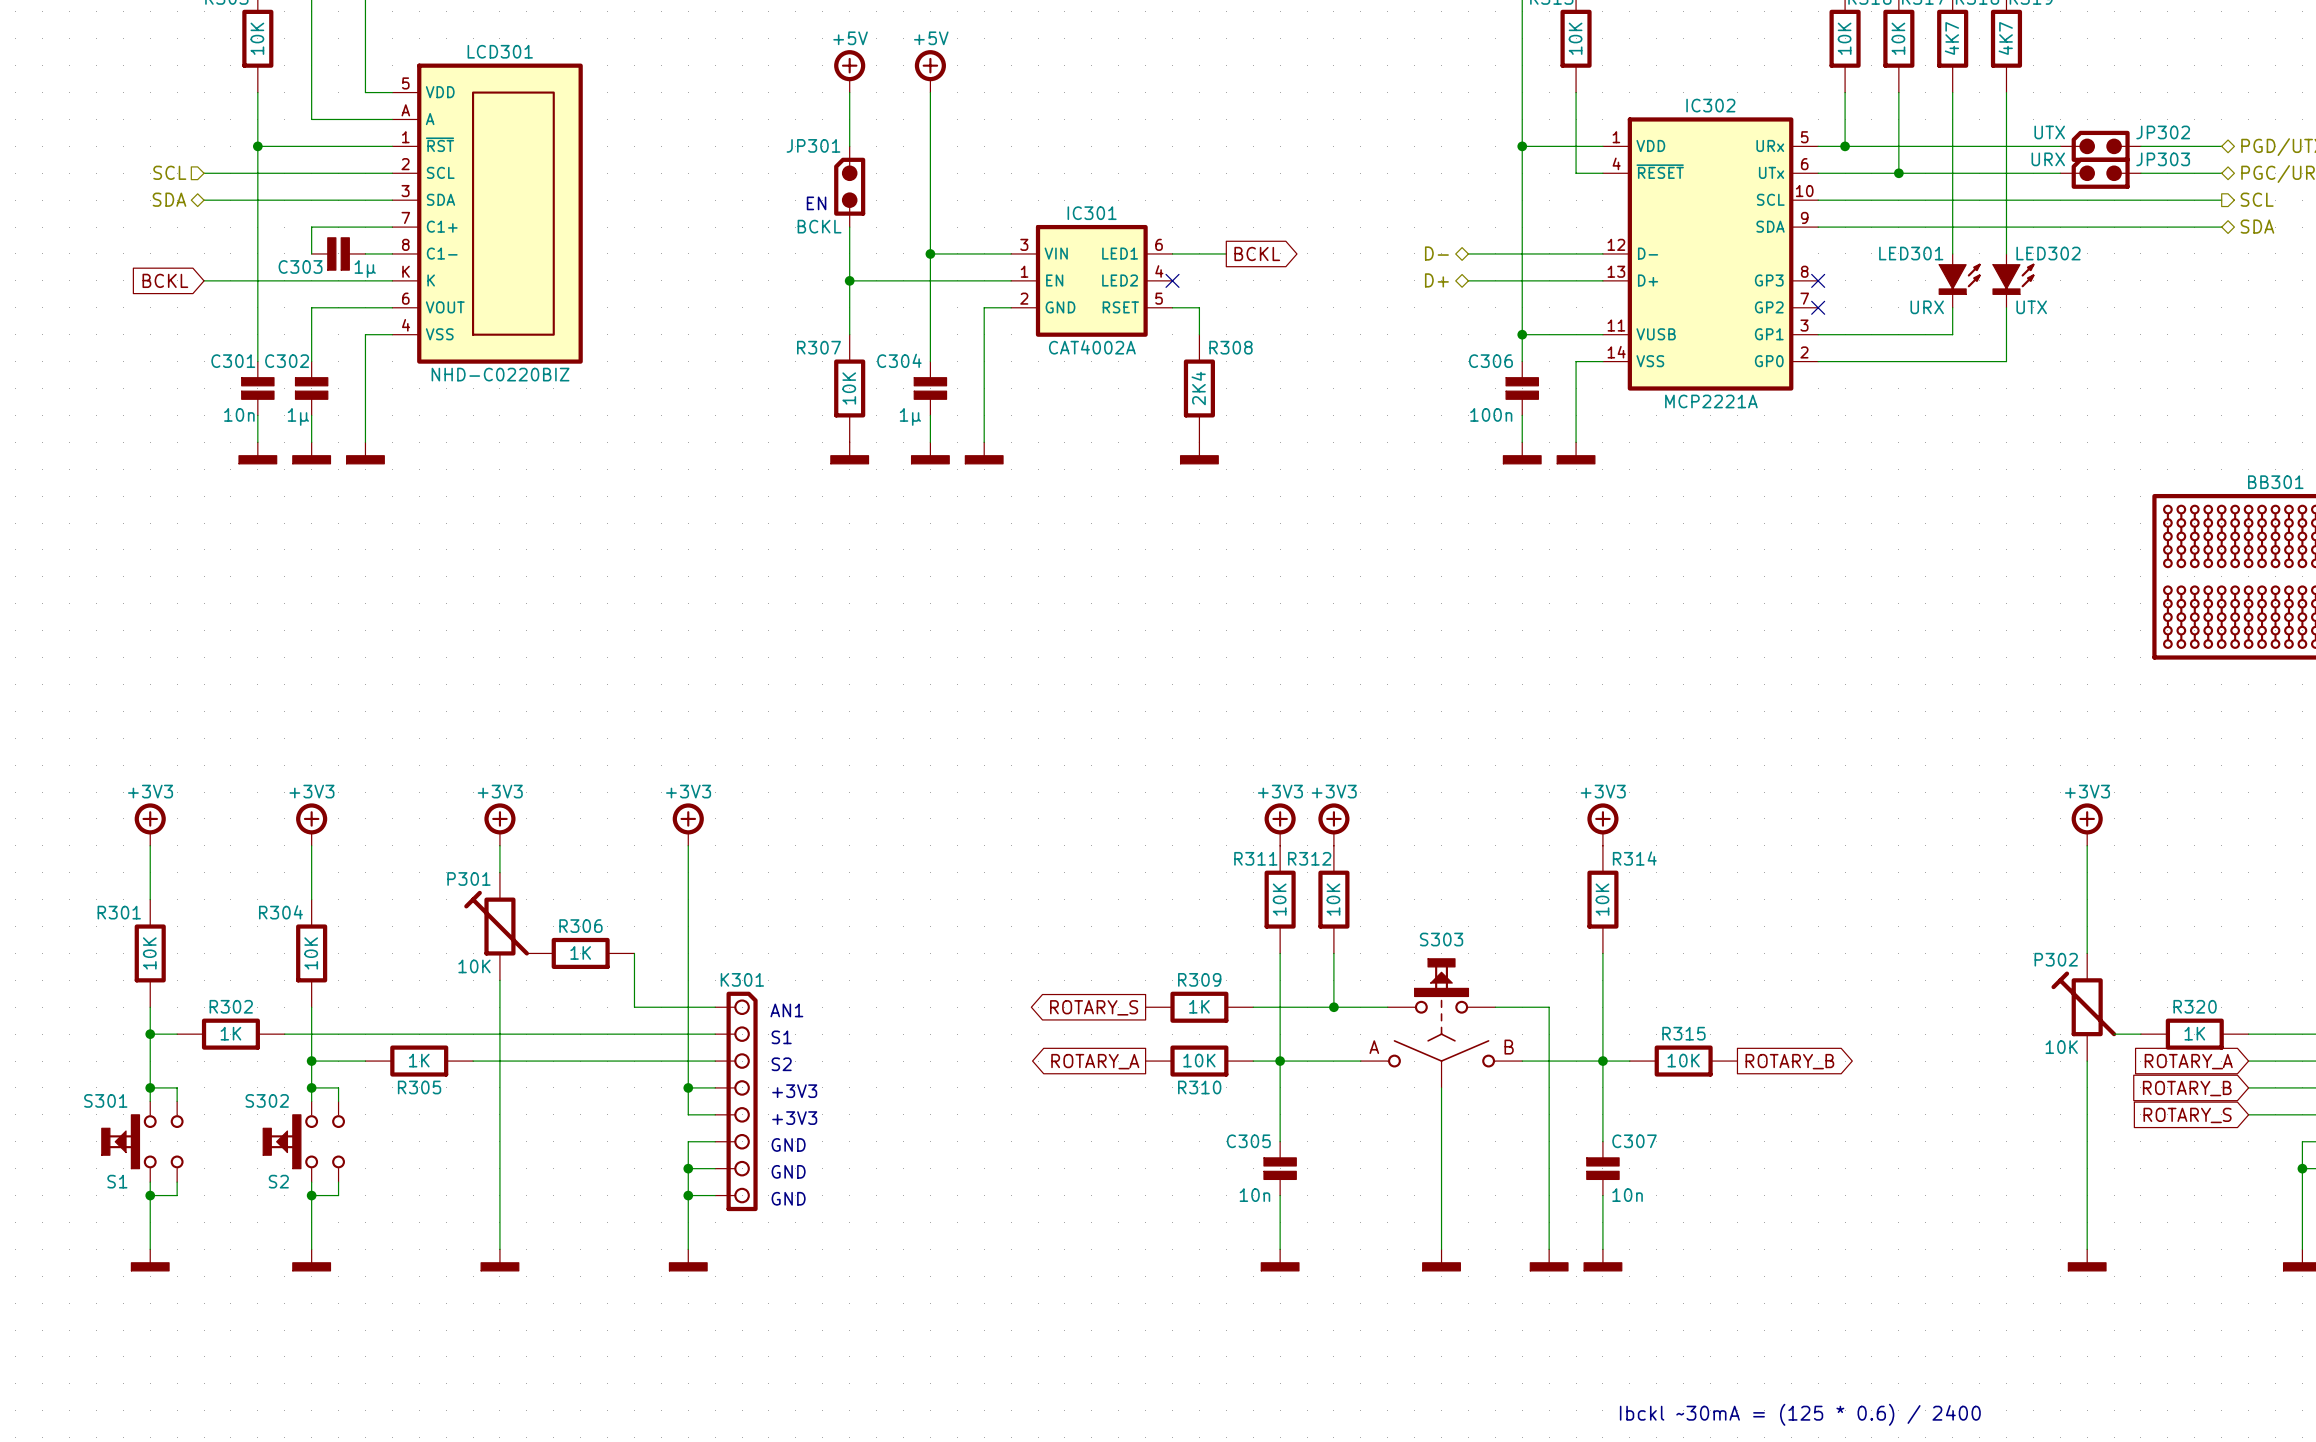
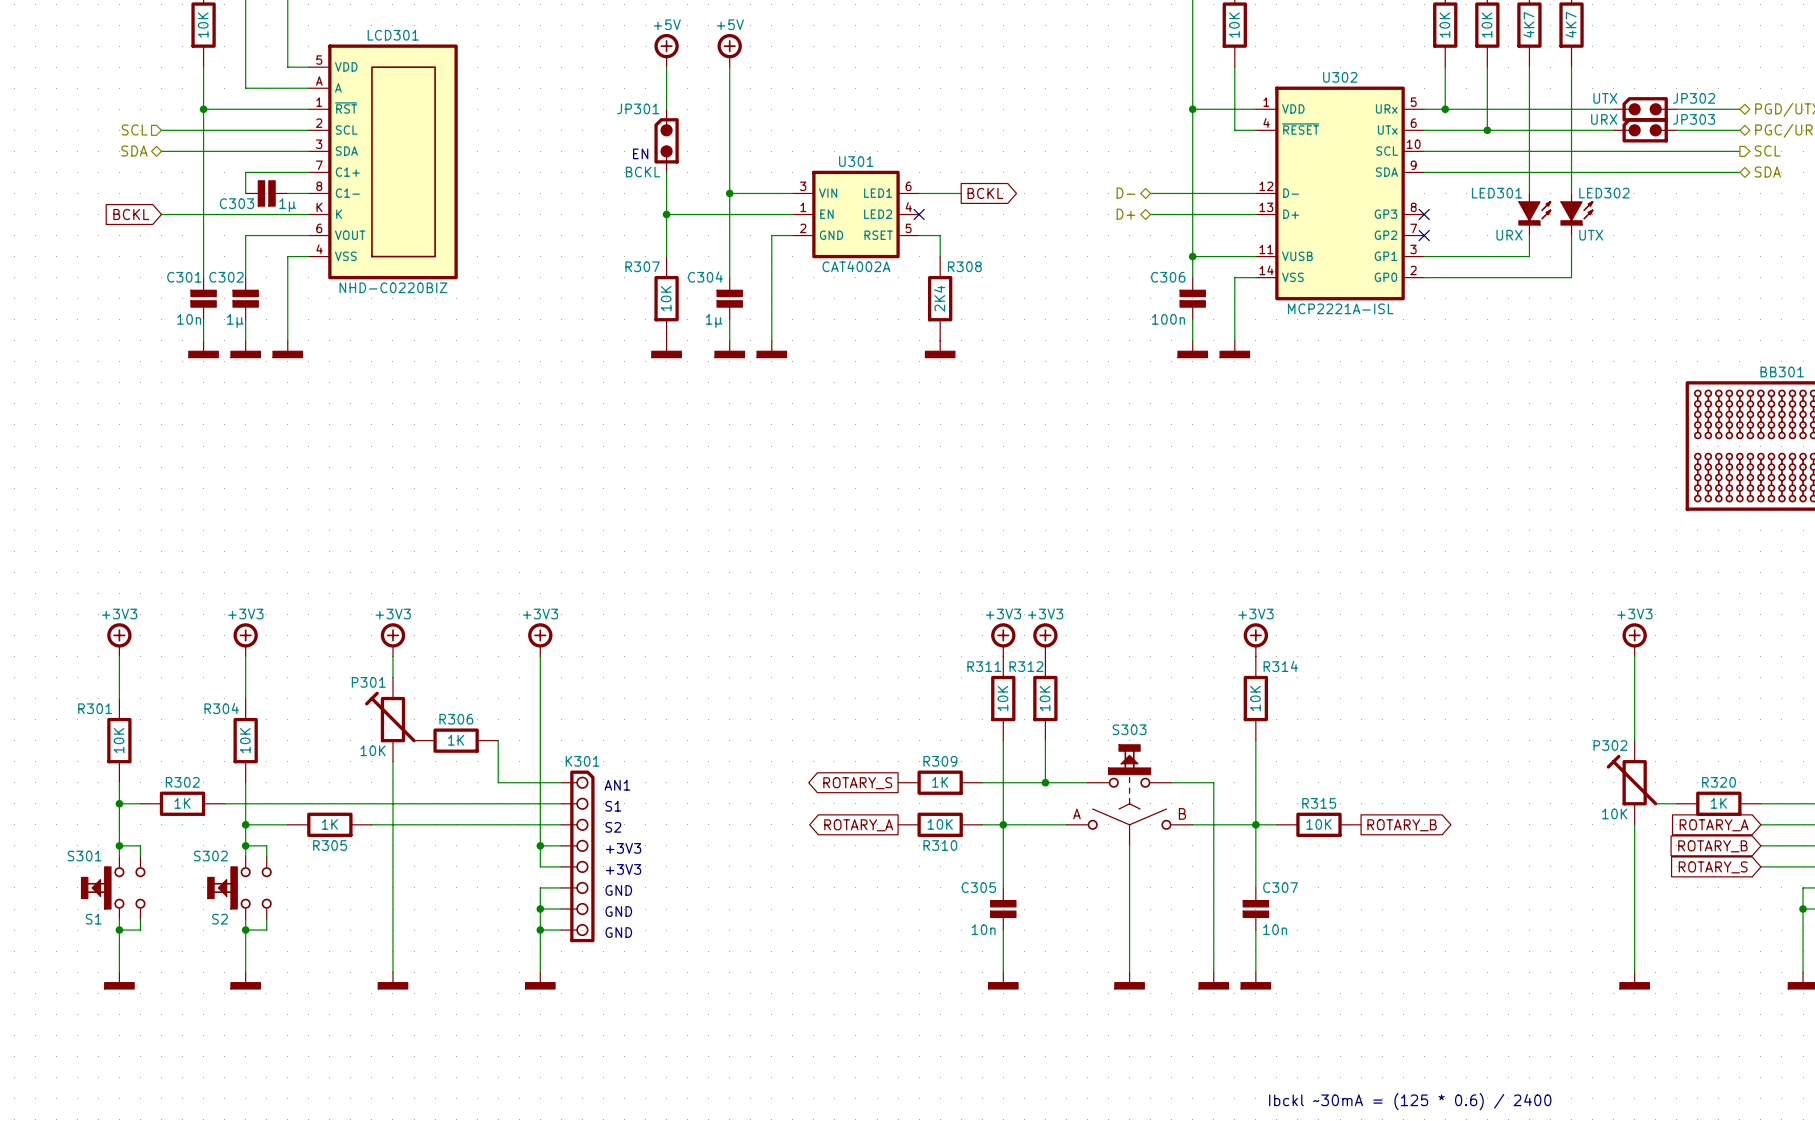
IC302 name: IC302 (1710, 105) -> U302 (1340, 77)
IC301 name: IC301 (1092, 213) -> U301 (856, 161)
IC302 text: MCP2221A (1711, 401) -> MCP2221A-ISL (1340, 308)

